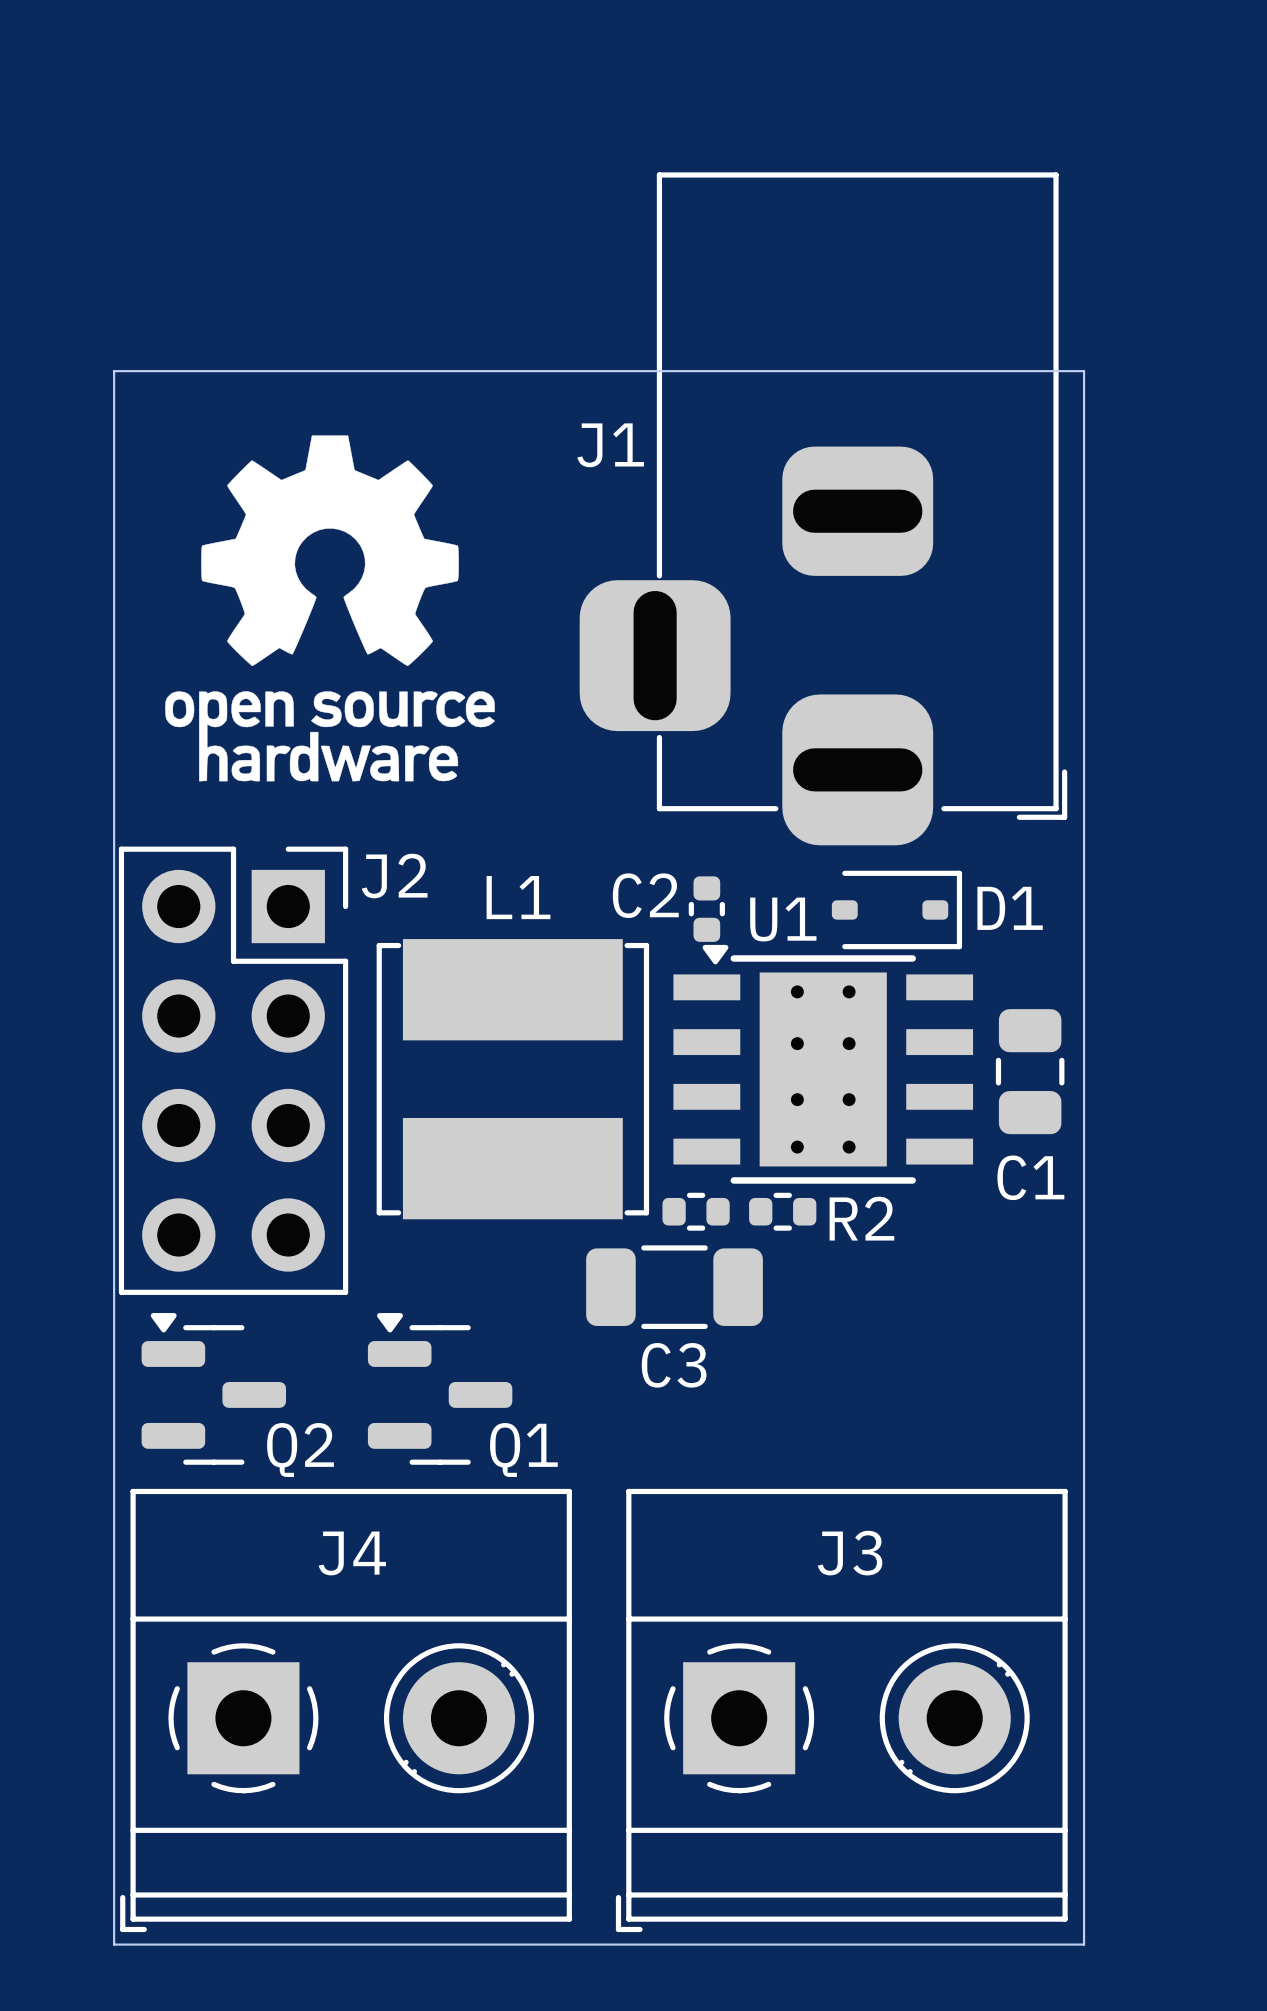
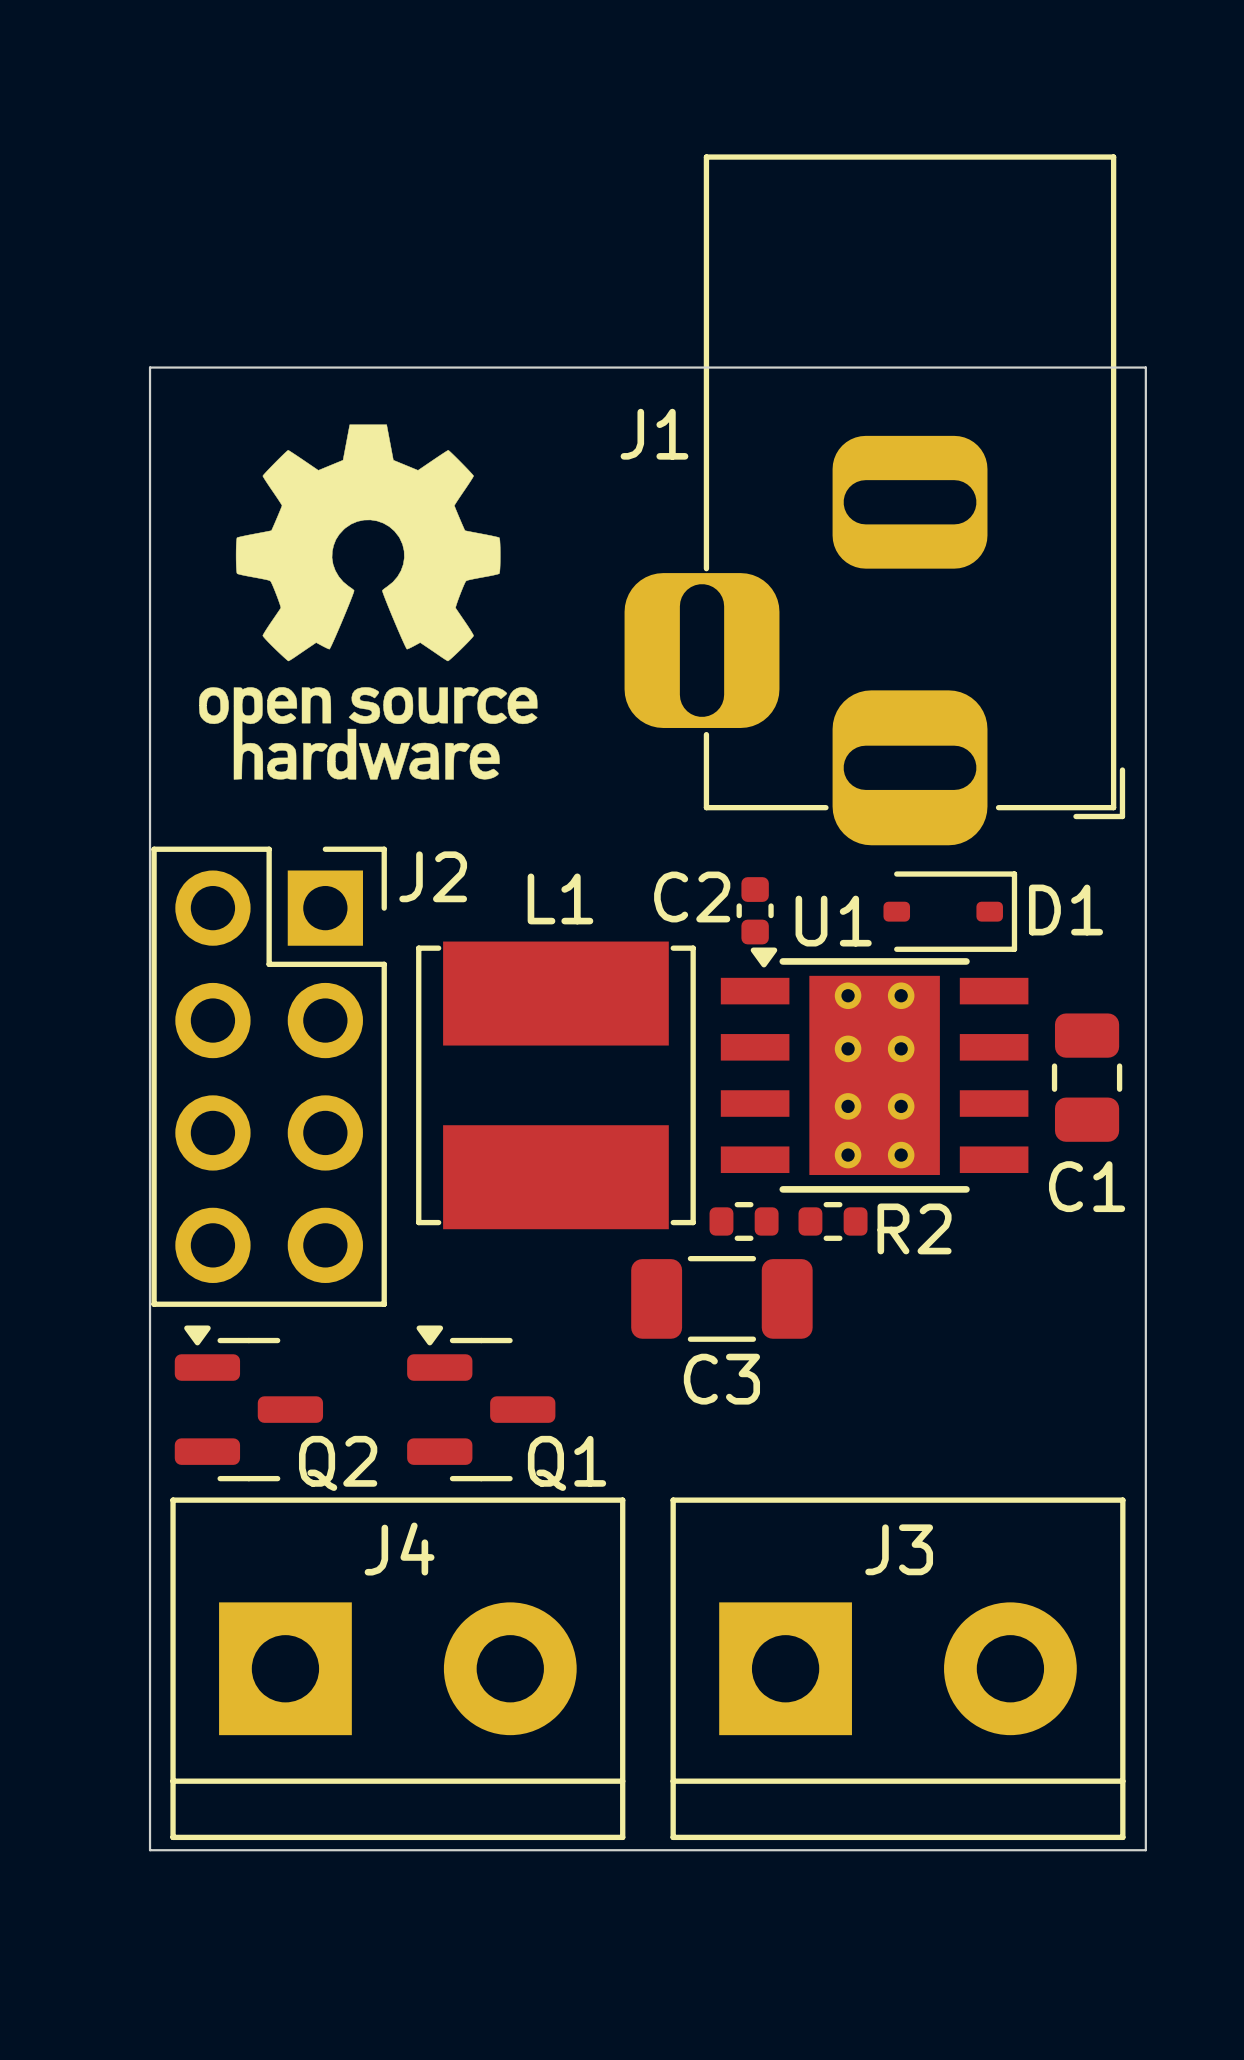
board edge: (114, 371) (114, 1944) (1084, 1944) (1084, 371) (114, 371) -> (150, 367) (150, 1850) (1145, 1850) (1145, 367) (150, 367)
J4 footprint: [120, 1488, 572, 1933] -> [170, 1497, 626, 1841]
J3 footprint: [615, 1488, 1068, 1933] -> [670, 1497, 1126, 1841]

